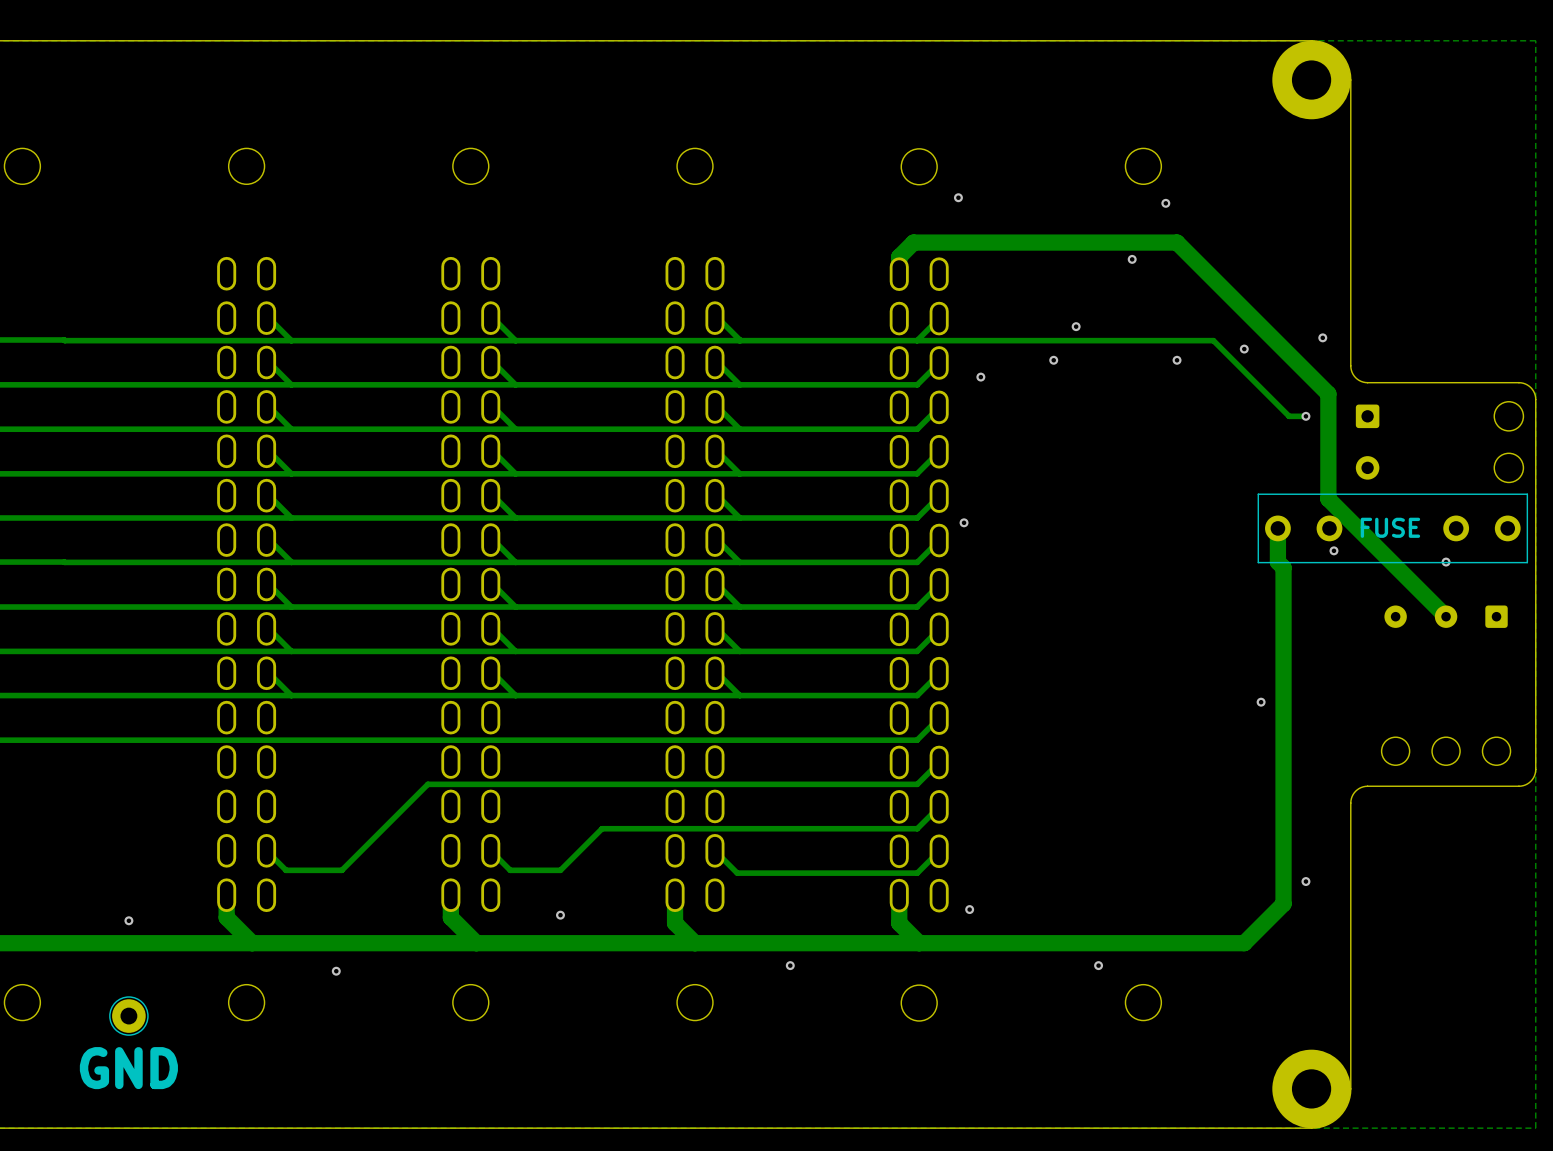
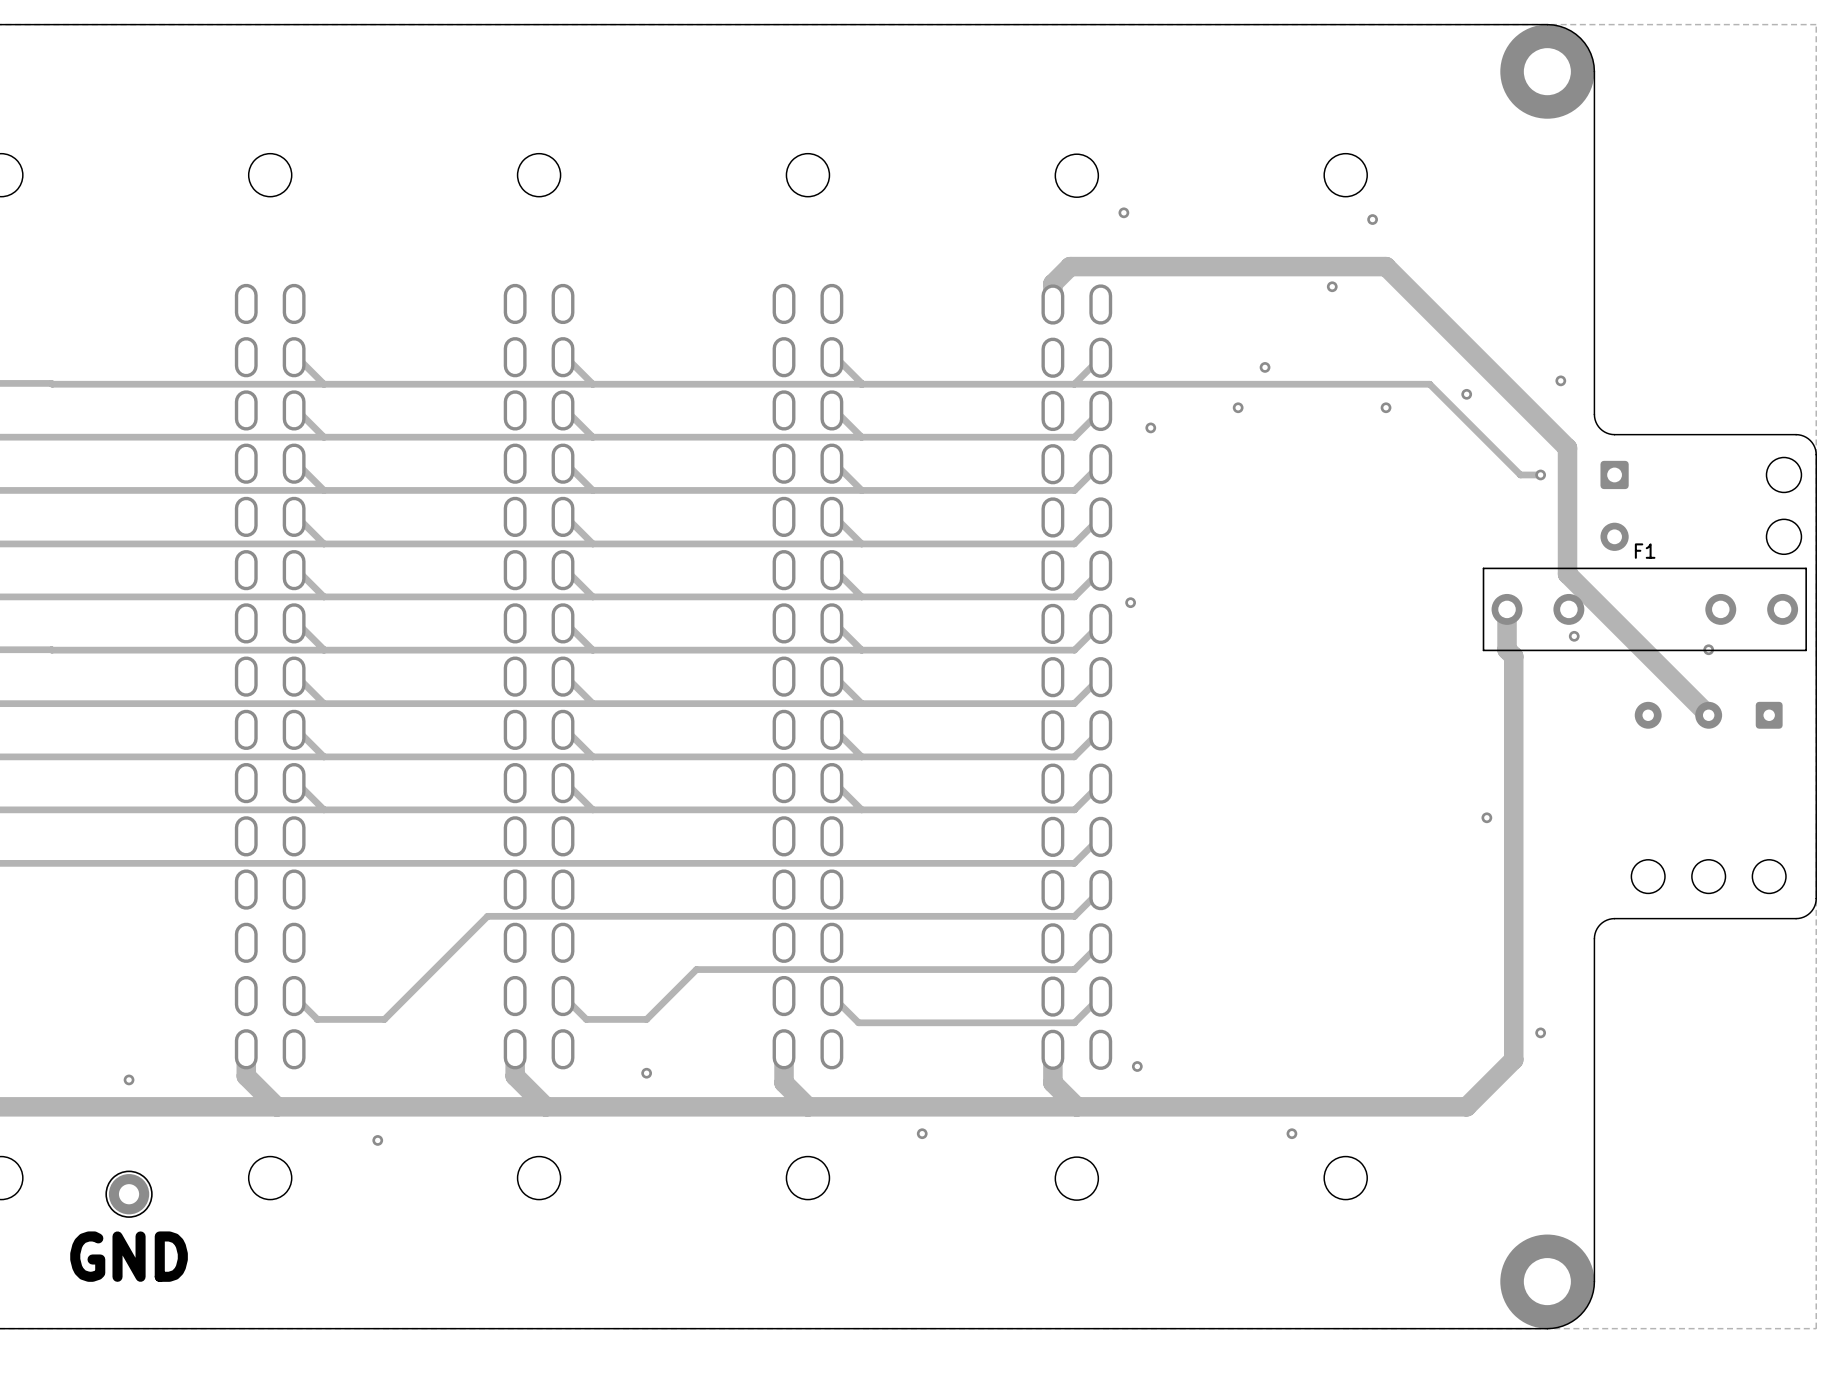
F1 name: none -> F1 (1645, 551)
text: FUSE (1390, 527) -> none

